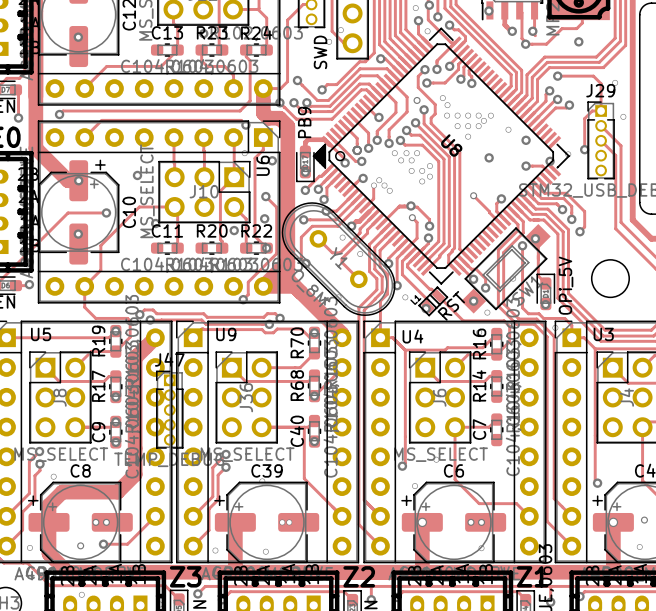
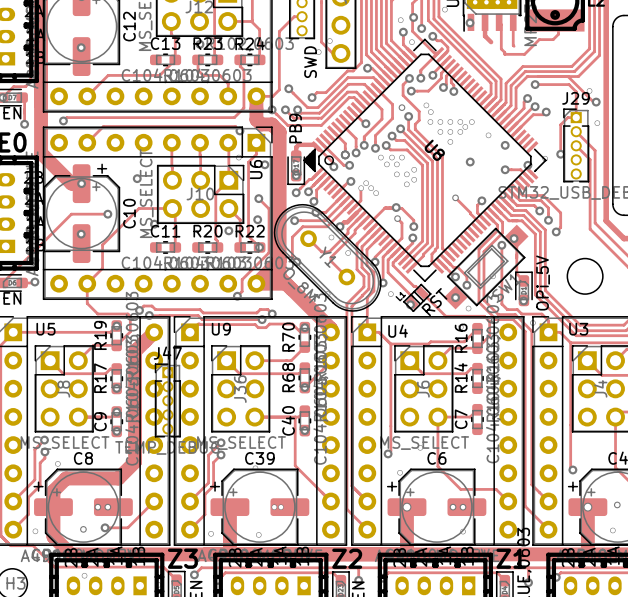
via: (512, 31) -> none
via: (532, 31) -> none
via: (578, 41) -> none
via: (525, 44) -> none
track: none -> (568, 76) (593, 102) (596, 102)
via: none -> (596, 102)

